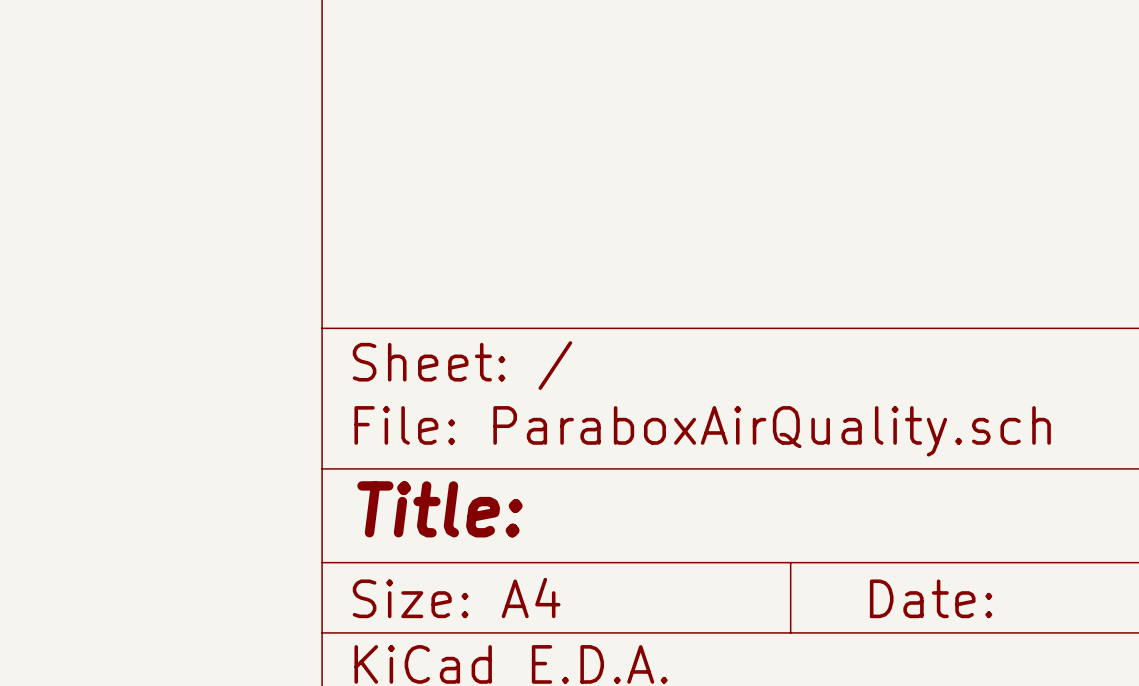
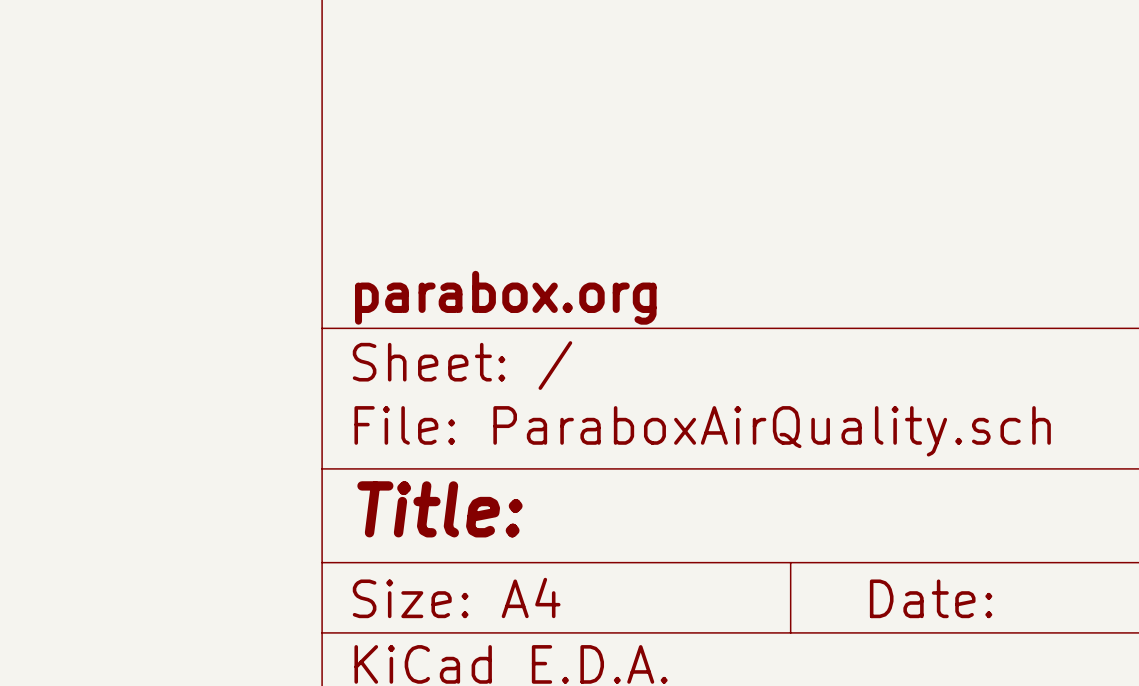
title block: none -> parabox.org (505, 297)

